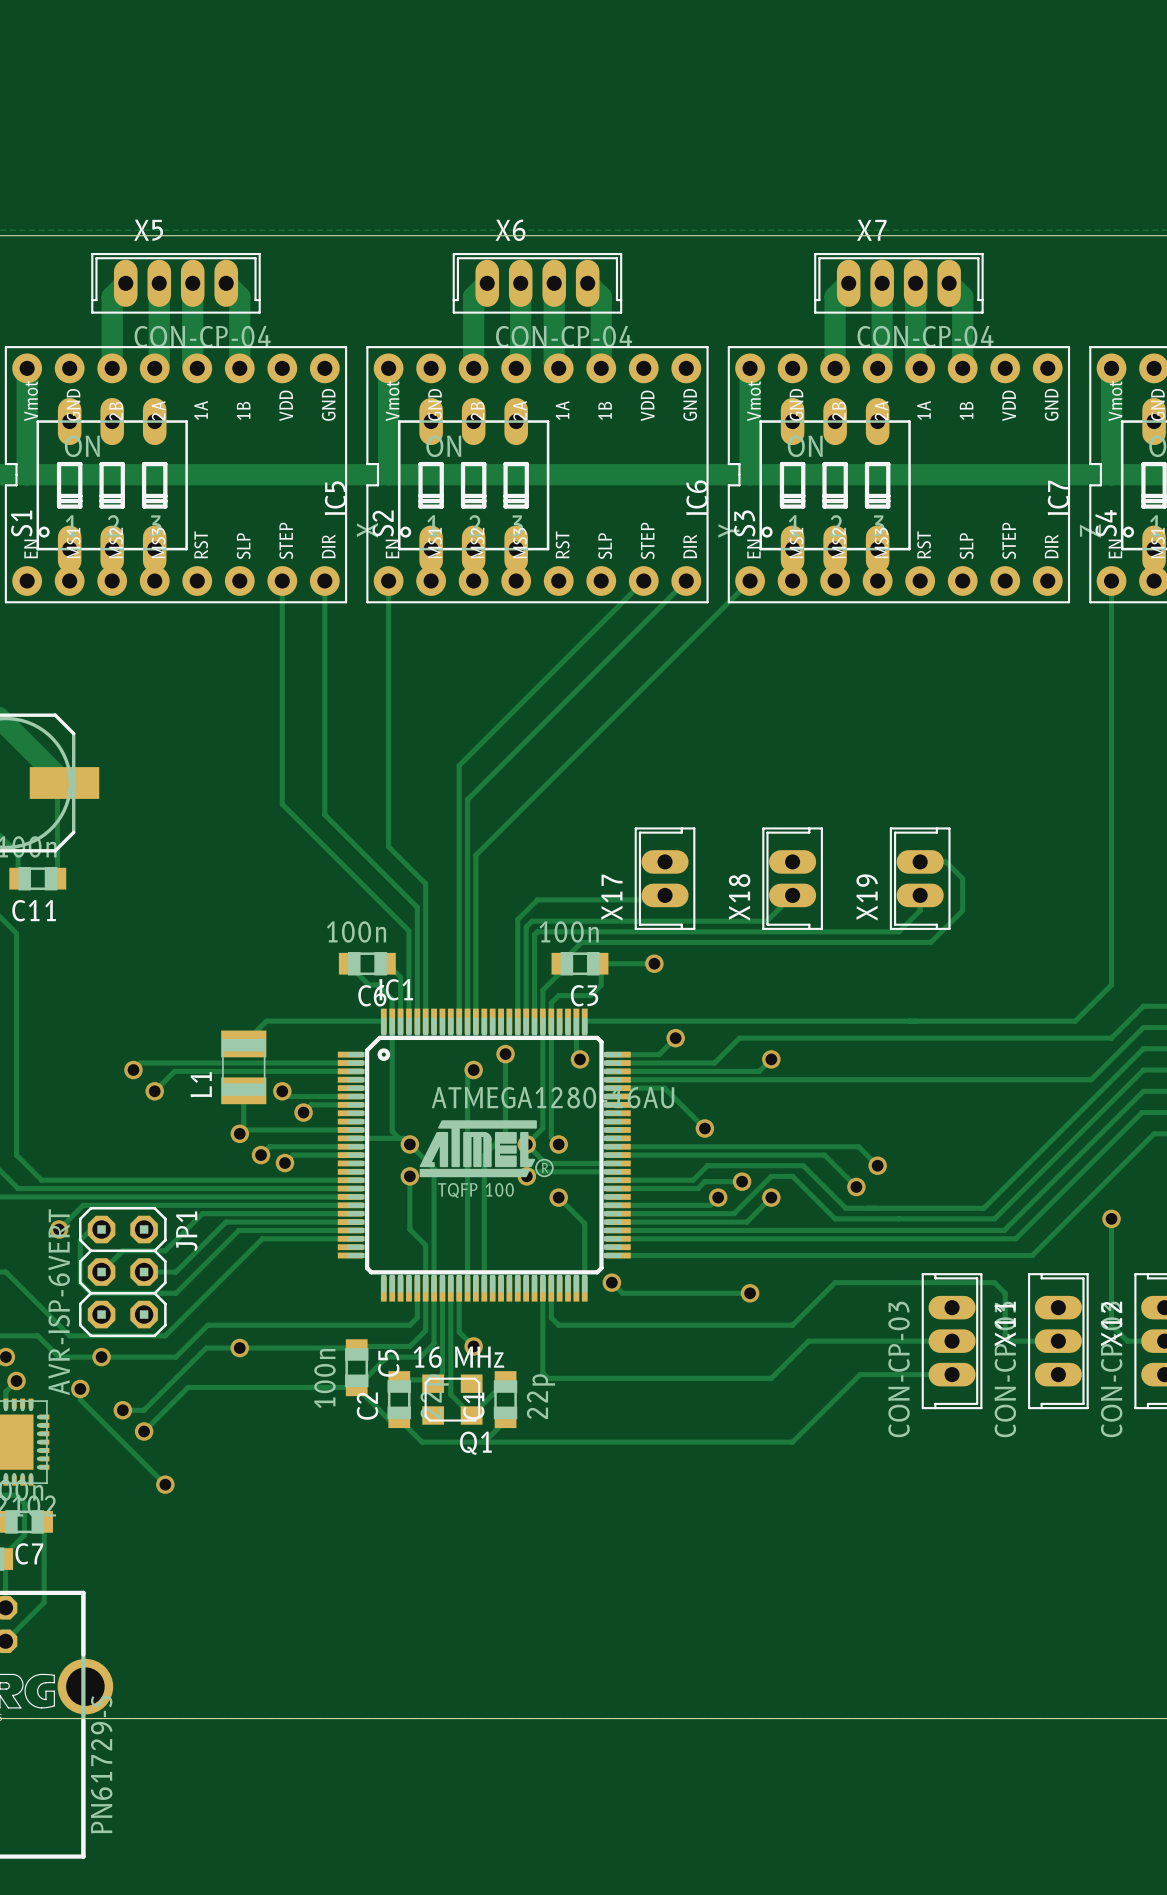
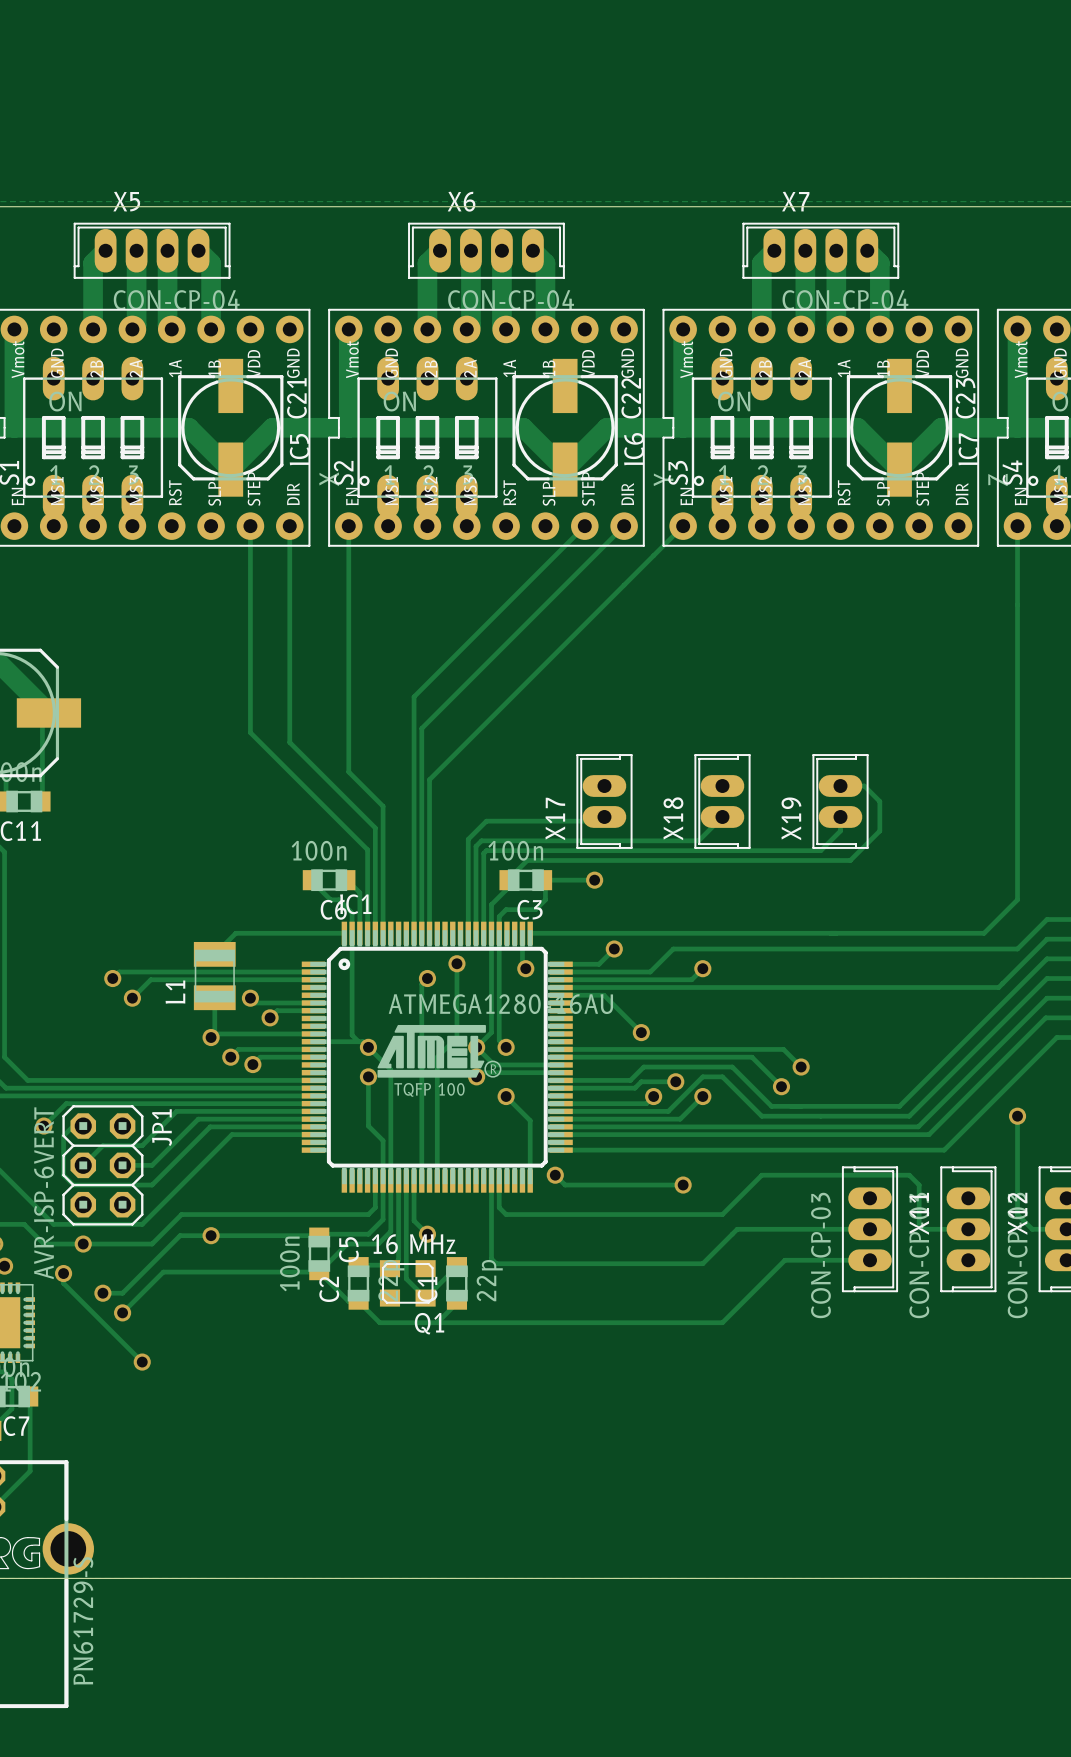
track: (215, 474) (306, 474) -> (188, 427) (230, 469) (272, 427)
C21: none -> (230, 427)
track: (577, 474) (667, 474) -> (523, 427) (565, 469) (606, 427)
C22: none -> (565, 427)
track: (938, 474) (1029, 474) -> (857, 427) (899, 469) (941, 427)
C23: none -> (899, 427)

